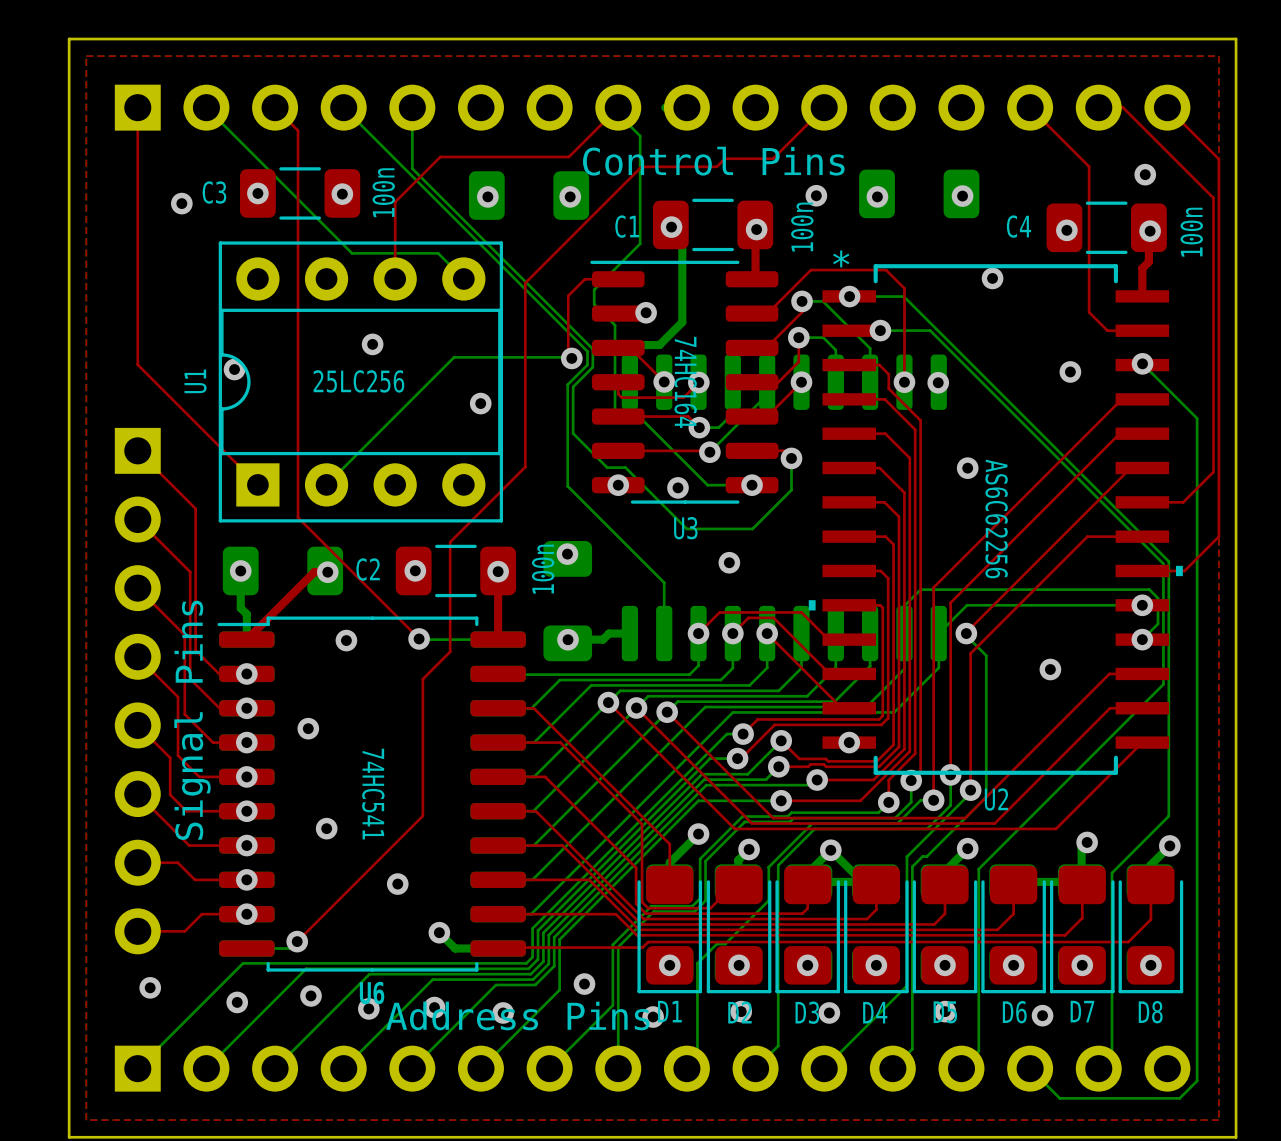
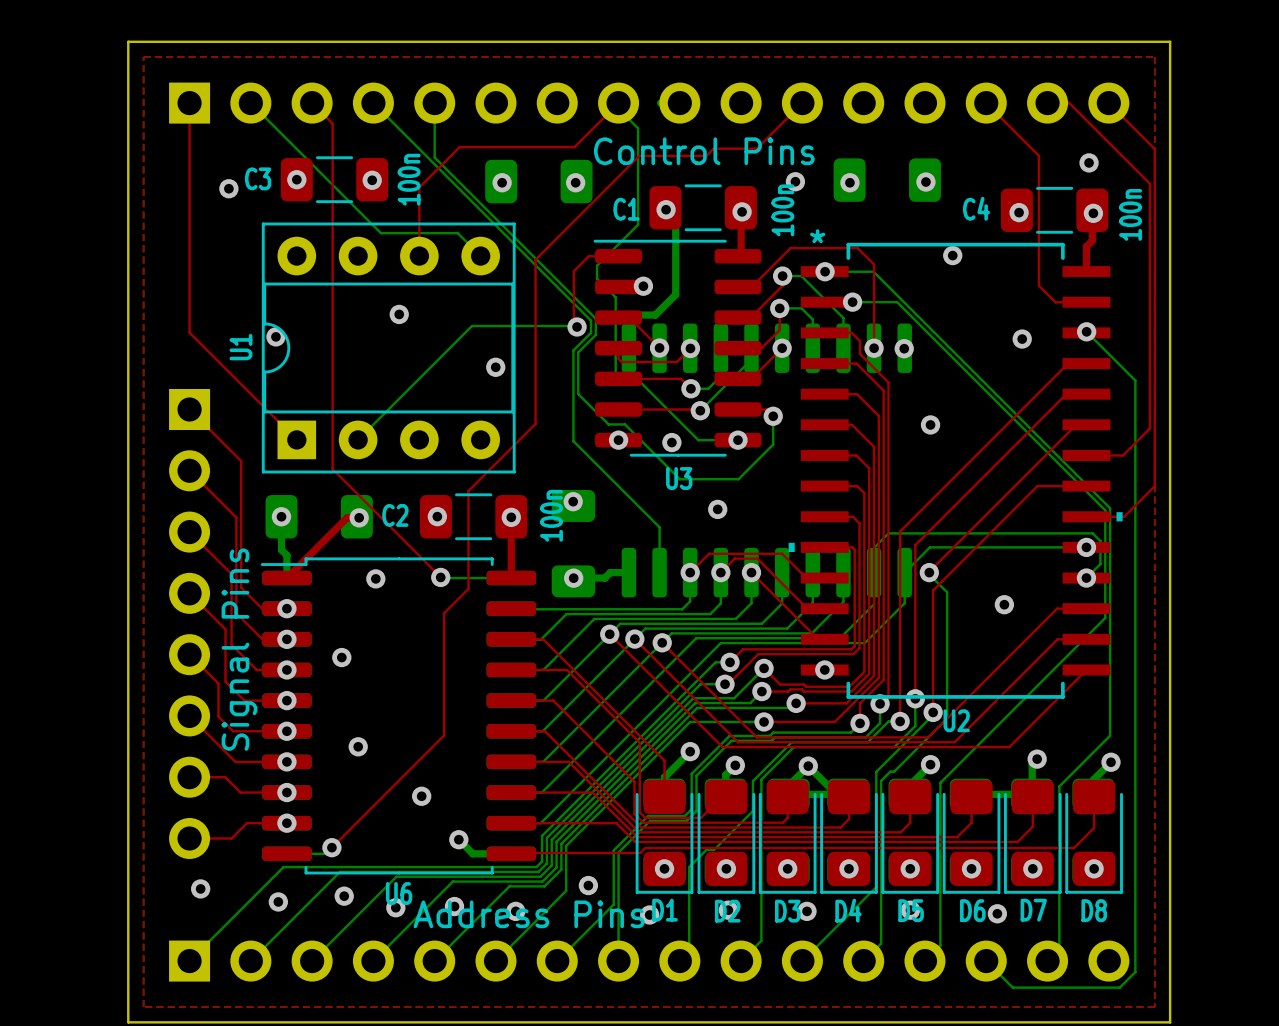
text: 25LC256 (358, 381) -> none
text: 74HC164 (685, 382) -> none
text: AS6C62256 (996, 518) -> none
text: 74HC541 (373, 794) -> none

